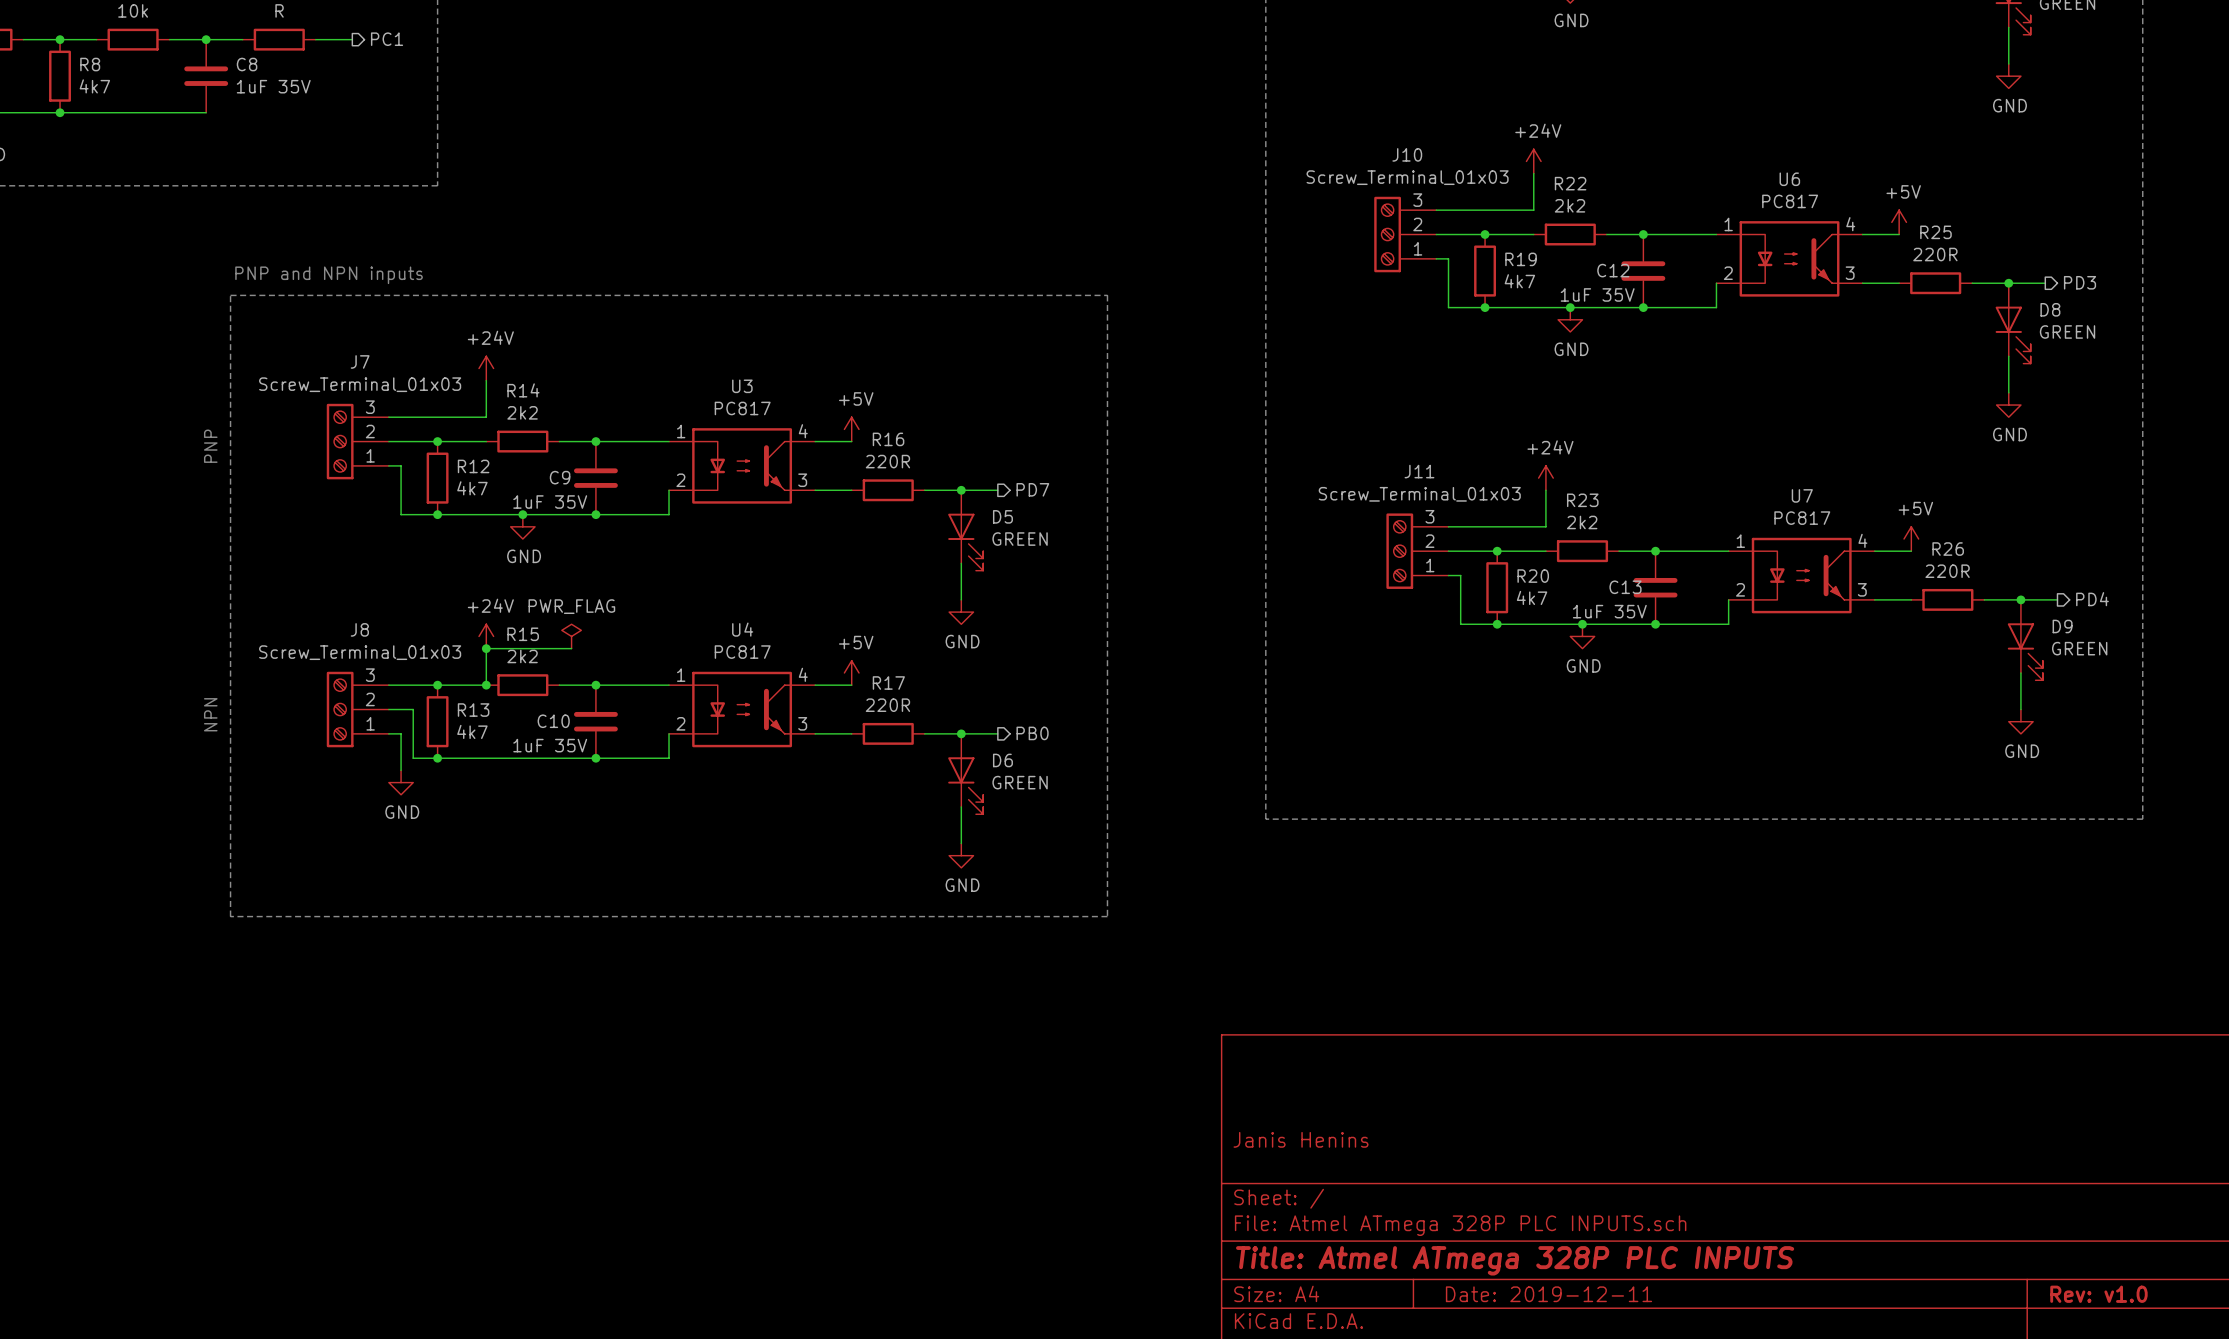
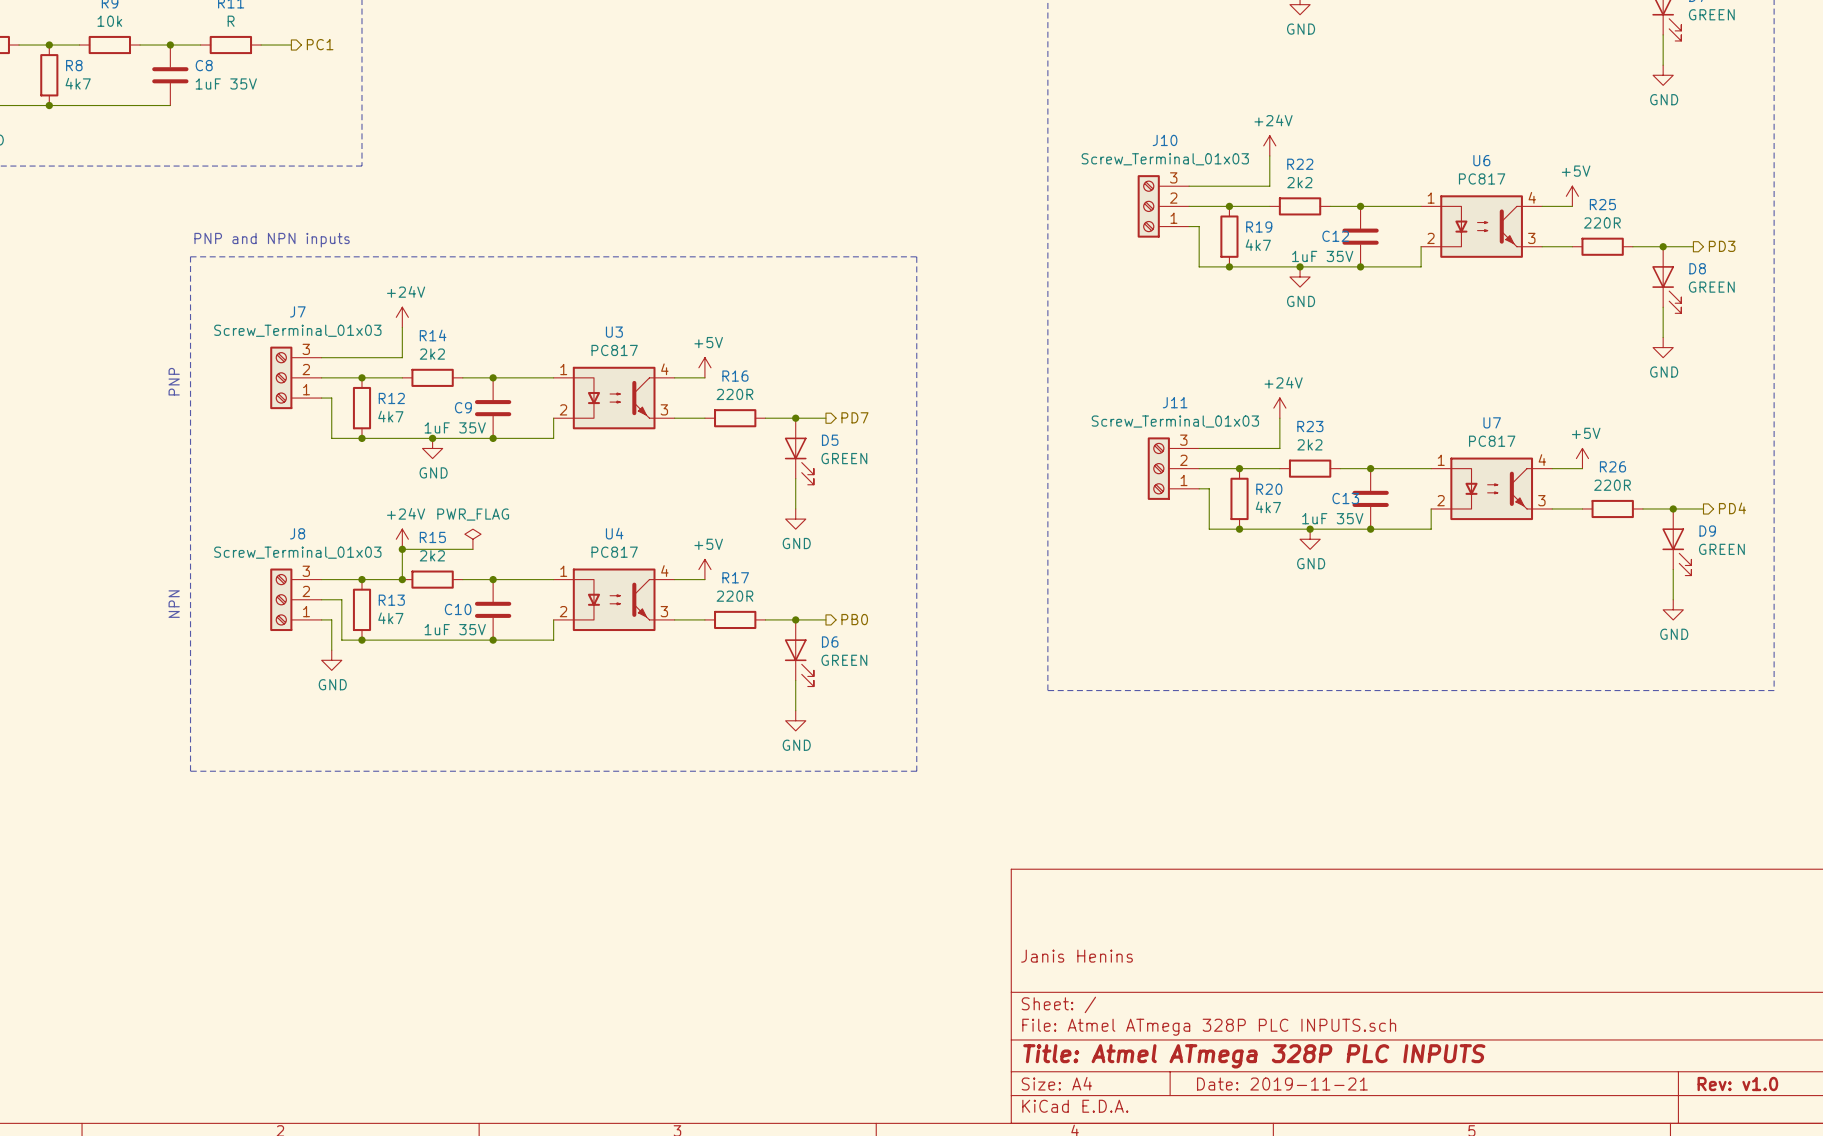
title block: Date: 2019-12-11 (1548, 1294) -> Date: 2019-11-21 (1282, 1084)

